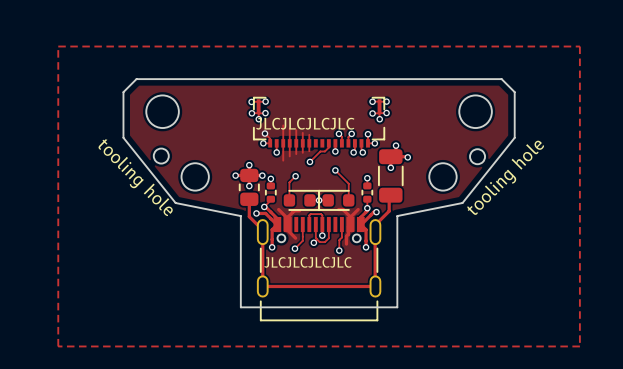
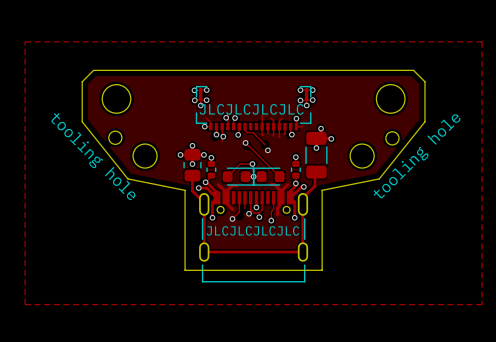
track: (283, 125) (283, 143) -> none
track: none -> (262, 115) (262, 126)
track: (302, 132) (302, 143) -> none
via: (264, 133) -> none
via: none -> (226, 117)
via: none -> (235, 118)
via: (338, 133) -> none
via: (351, 133) -> none
track: (309, 134) (309, 143) -> none
track: (289, 143) (289, 156) -> none
track: (296, 143) (296, 154) -> none
track: none -> (273, 126) (272, 136)
track: none -> (279, 126) (279, 137)
via: (374, 143) -> none
track: (309, 147) (309, 151) -> (245, 130) (247, 132) (253, 132) (265, 144)
track: (328, 147) (324, 151) (320, 151) (309, 161) -> (262, 130) (263, 135)
via: (335, 151) -> none
via: none -> (238, 134)
via: (353, 152) -> none
via: none -> (223, 136)
track: (335, 170) (348, 183) (348, 200) -> (247, 145) (279, 176)
track: (295, 176) (289, 182) (289, 200) -> (252, 164) (240, 164) (227, 176)
via: (295, 176) -> none
via: none -> (252, 164)
track: (309, 224) (310, 214) (321, 214) (322, 224) -> (245, 197) (245, 208)
via: none -> (259, 217)

